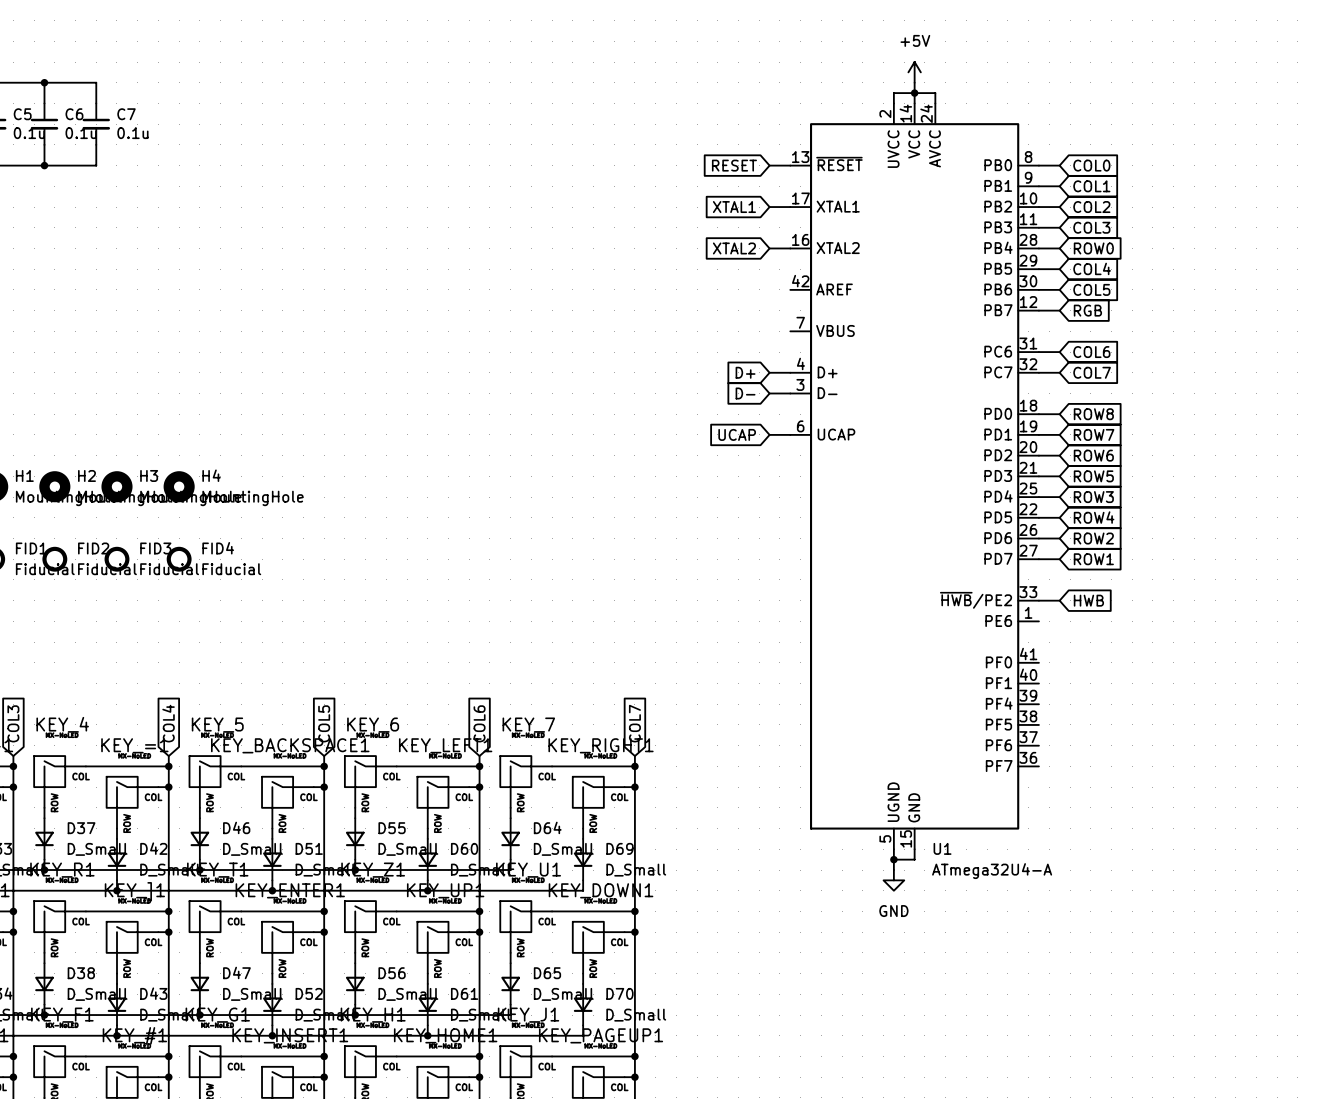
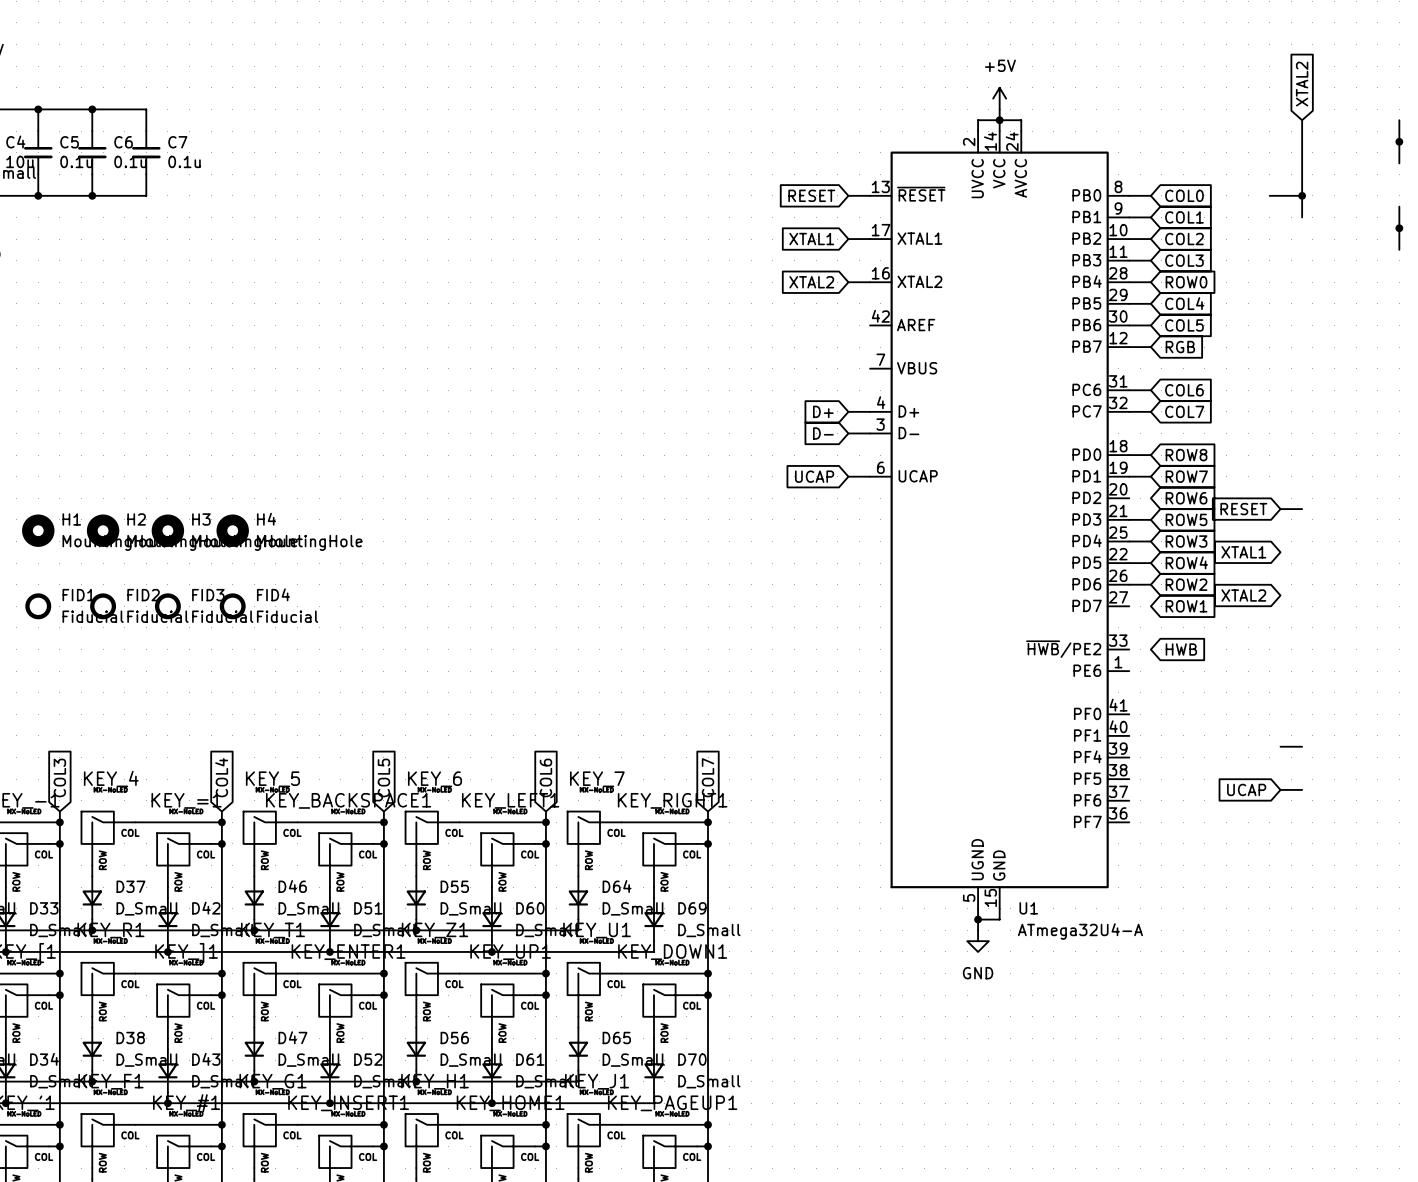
global label: none -> XTAL2 (1302, 84)
wire: none -> (1302, 120) (1302, 217)
wire: none -> (1399, 120) (1399, 163)
junction: none -> (1399, 141)
wire: none -> (1269, 195) (1302, 195)
junction: none -> (1302, 195)
wire: none -> (1399, 206) (1399, 249)
junction: none -> (1399, 228)
wire: (1038, 455) (1059, 455) -> (1280, 509) (1302, 509)
global label: none -> RESET (1243, 509)
global label: none -> XTAL1 (1243, 552)
global label: none -> XTAL2 (1243, 595)
wire: (1038, 559) (1059, 559) -> (1280, 746) (1302, 746)
wire: (1038, 600) (1059, 600) -> (1280, 789) (1302, 789)
global label: none -> UCAP (1246, 789)

